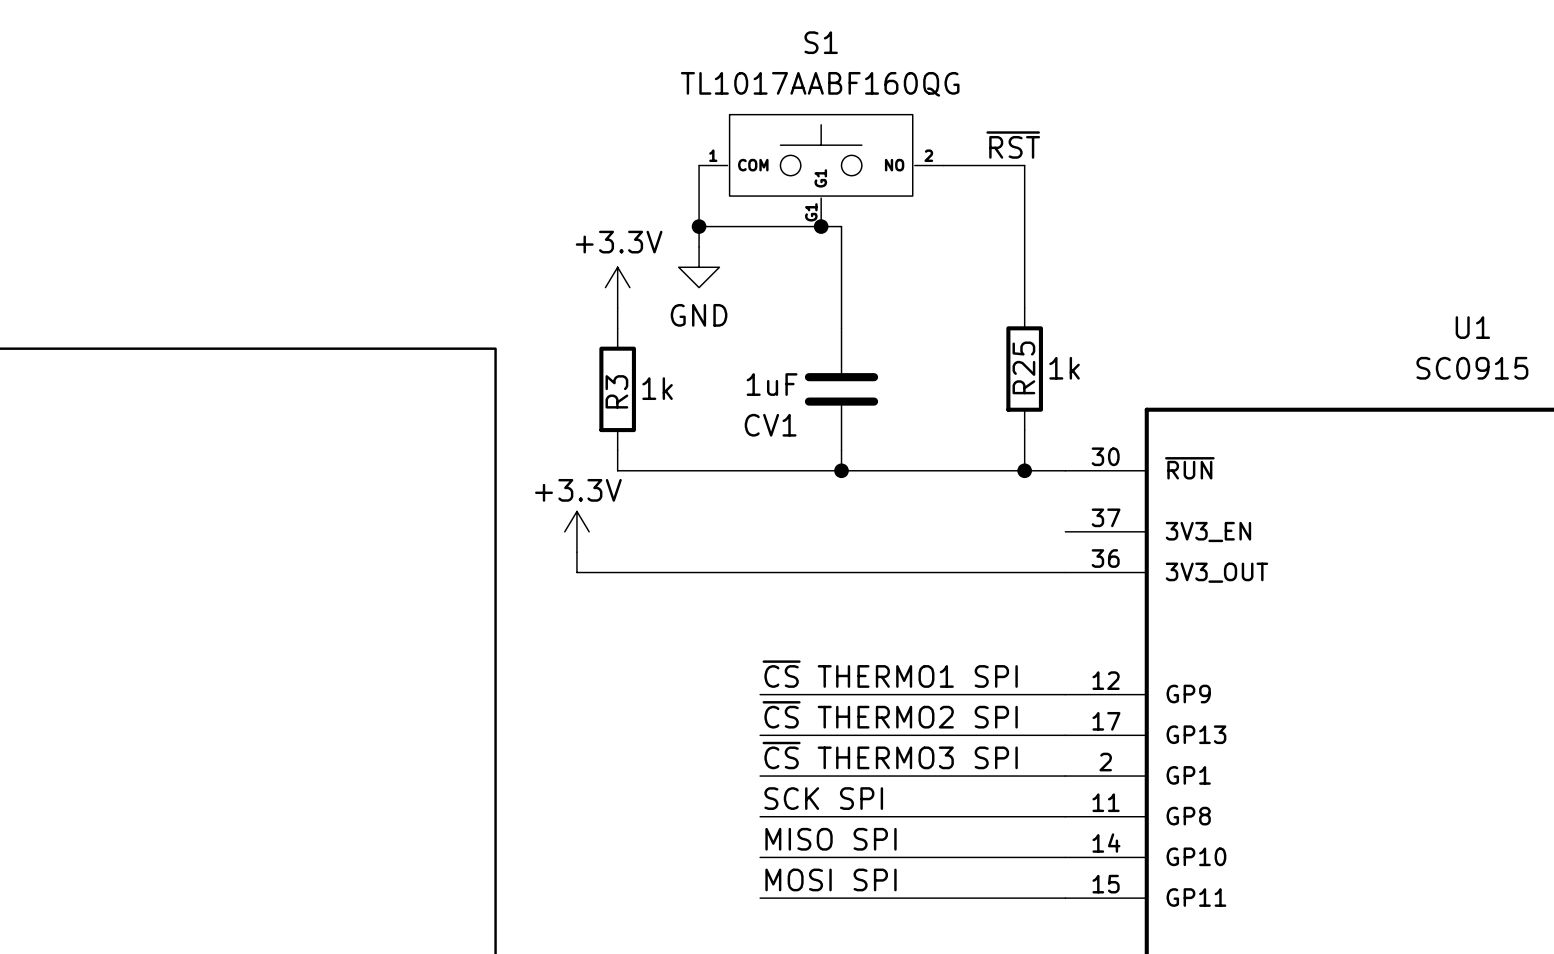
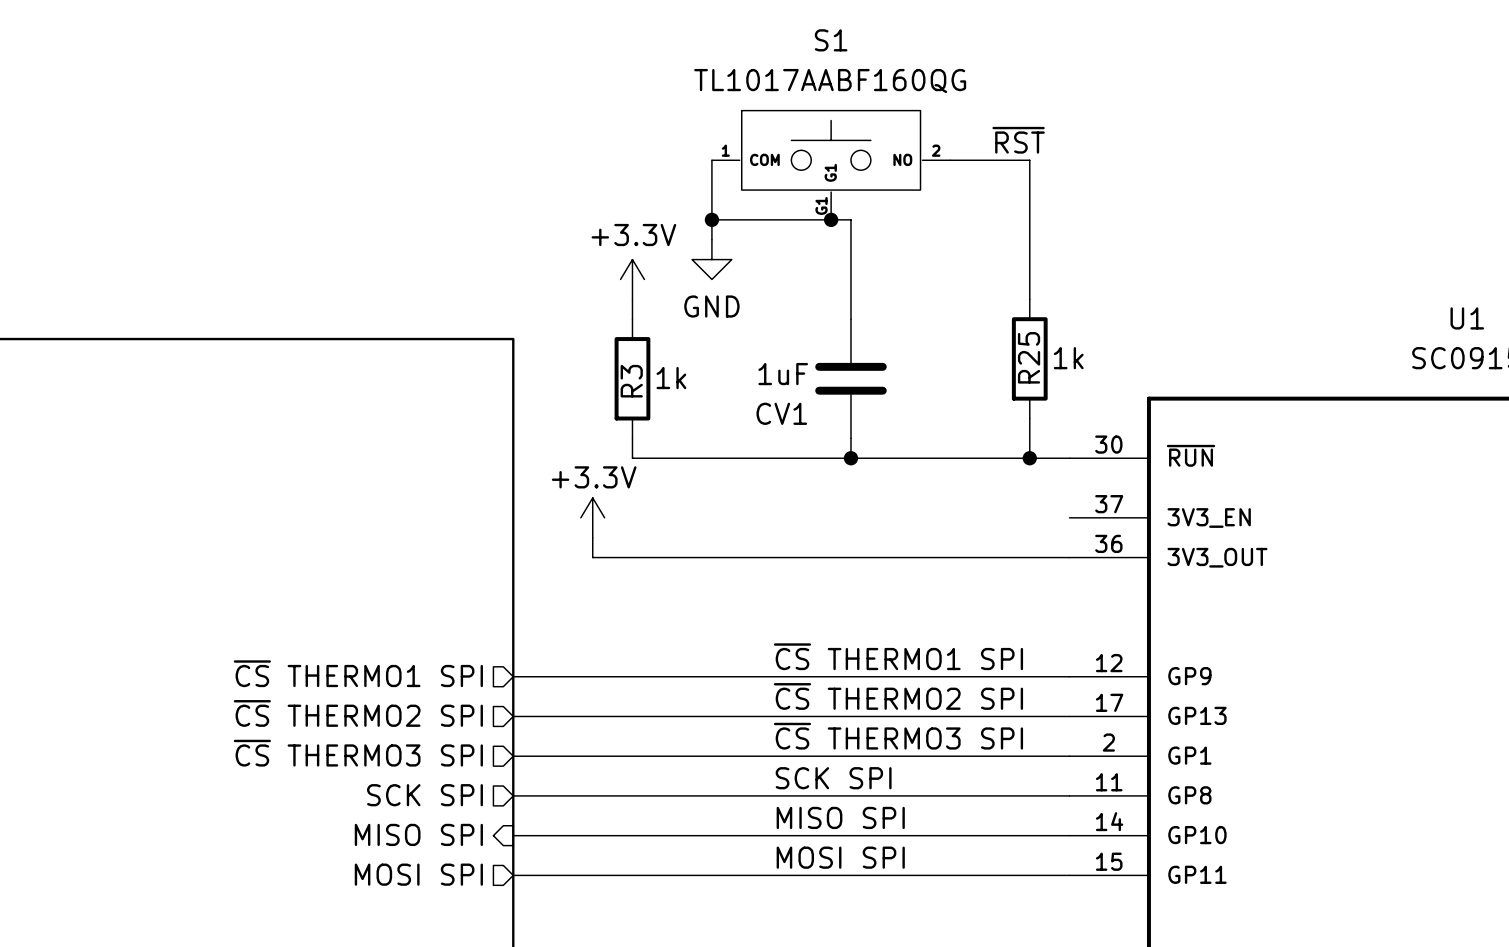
sheet pin: none -> ~{CS} THERMO1 SPI (358, 673)
wire: none -> (513, 676) (771, 676)
sheet pin: none -> ~{CS} THERMO2 SPI (358, 713)
wire: none -> (513, 716) (771, 716)
sheet pin: none -> ~{CS} THERMO3 SPI (358, 753)
wire: none -> (513, 756) (771, 756)
sheet pin: none -> SCK SPI (425, 795)
wire: none -> (513, 795) (771, 795)
sheet pin: none -> MISO SPI (418, 834)
wire: none -> (513, 835) (771, 835)
sheet pin: none -> MOSI SPI (418, 874)
wire: none -> (513, 875) (771, 875)

